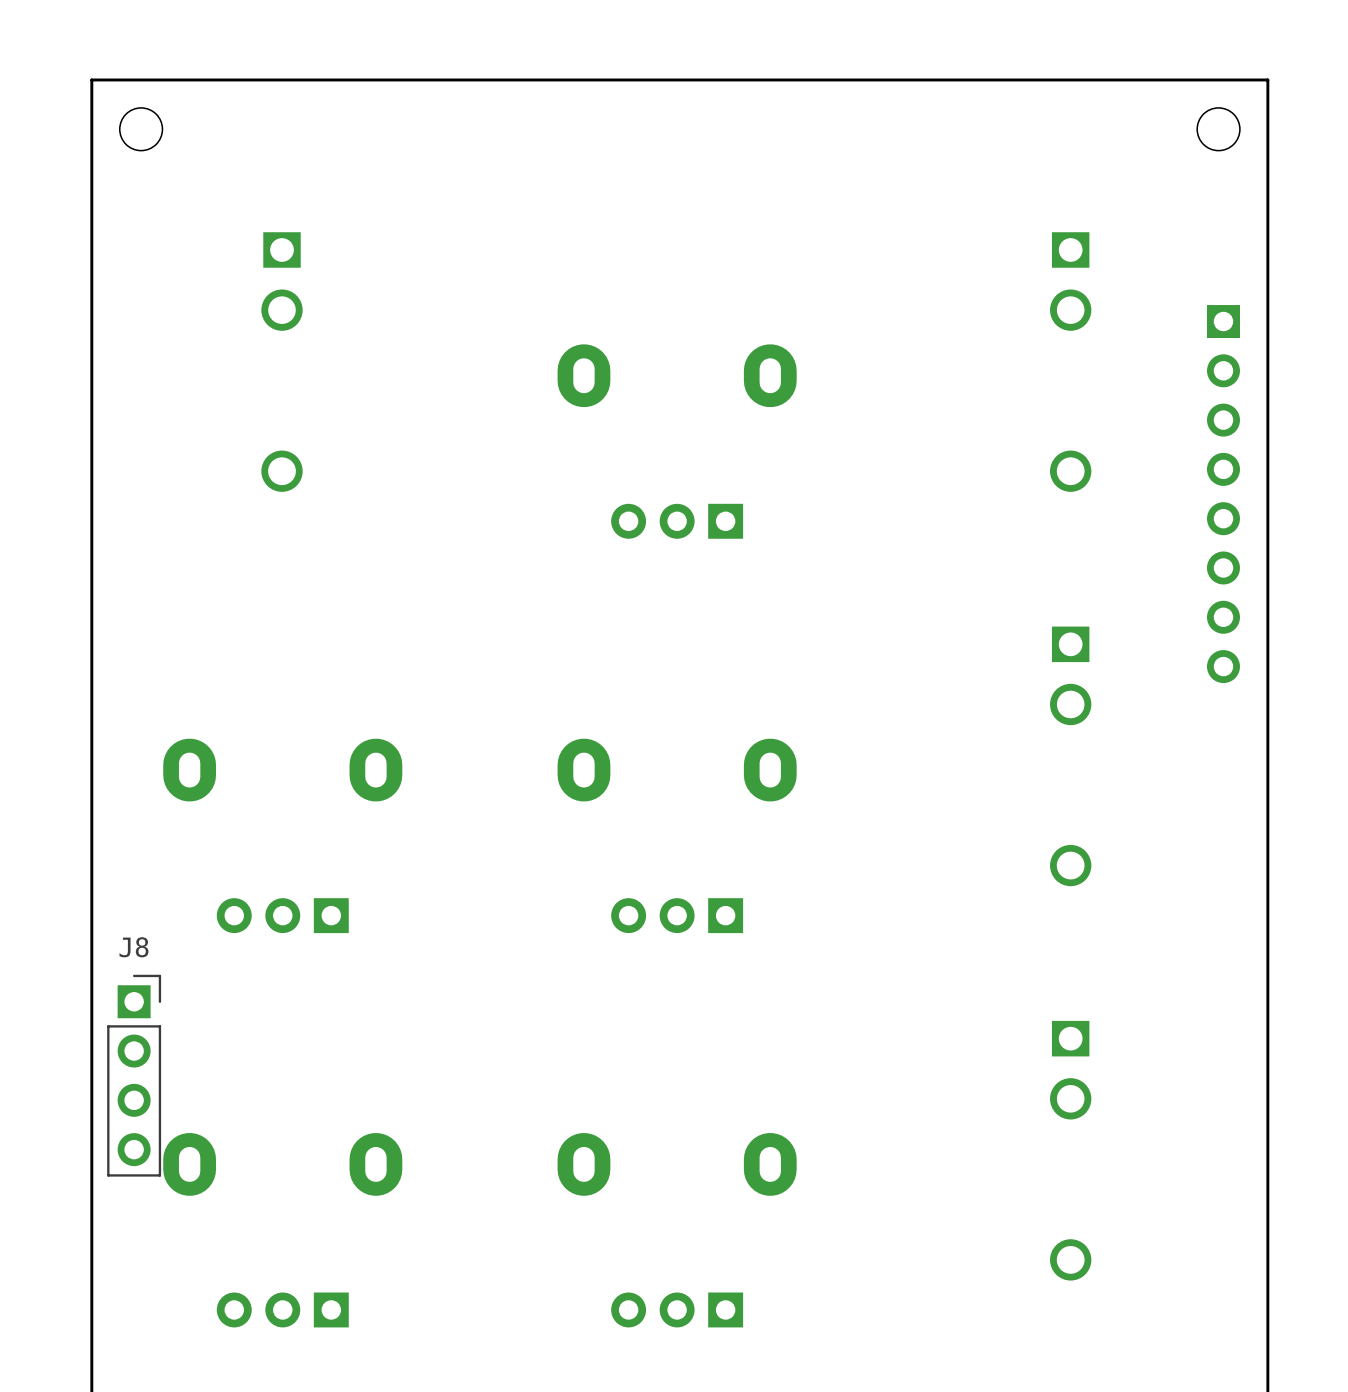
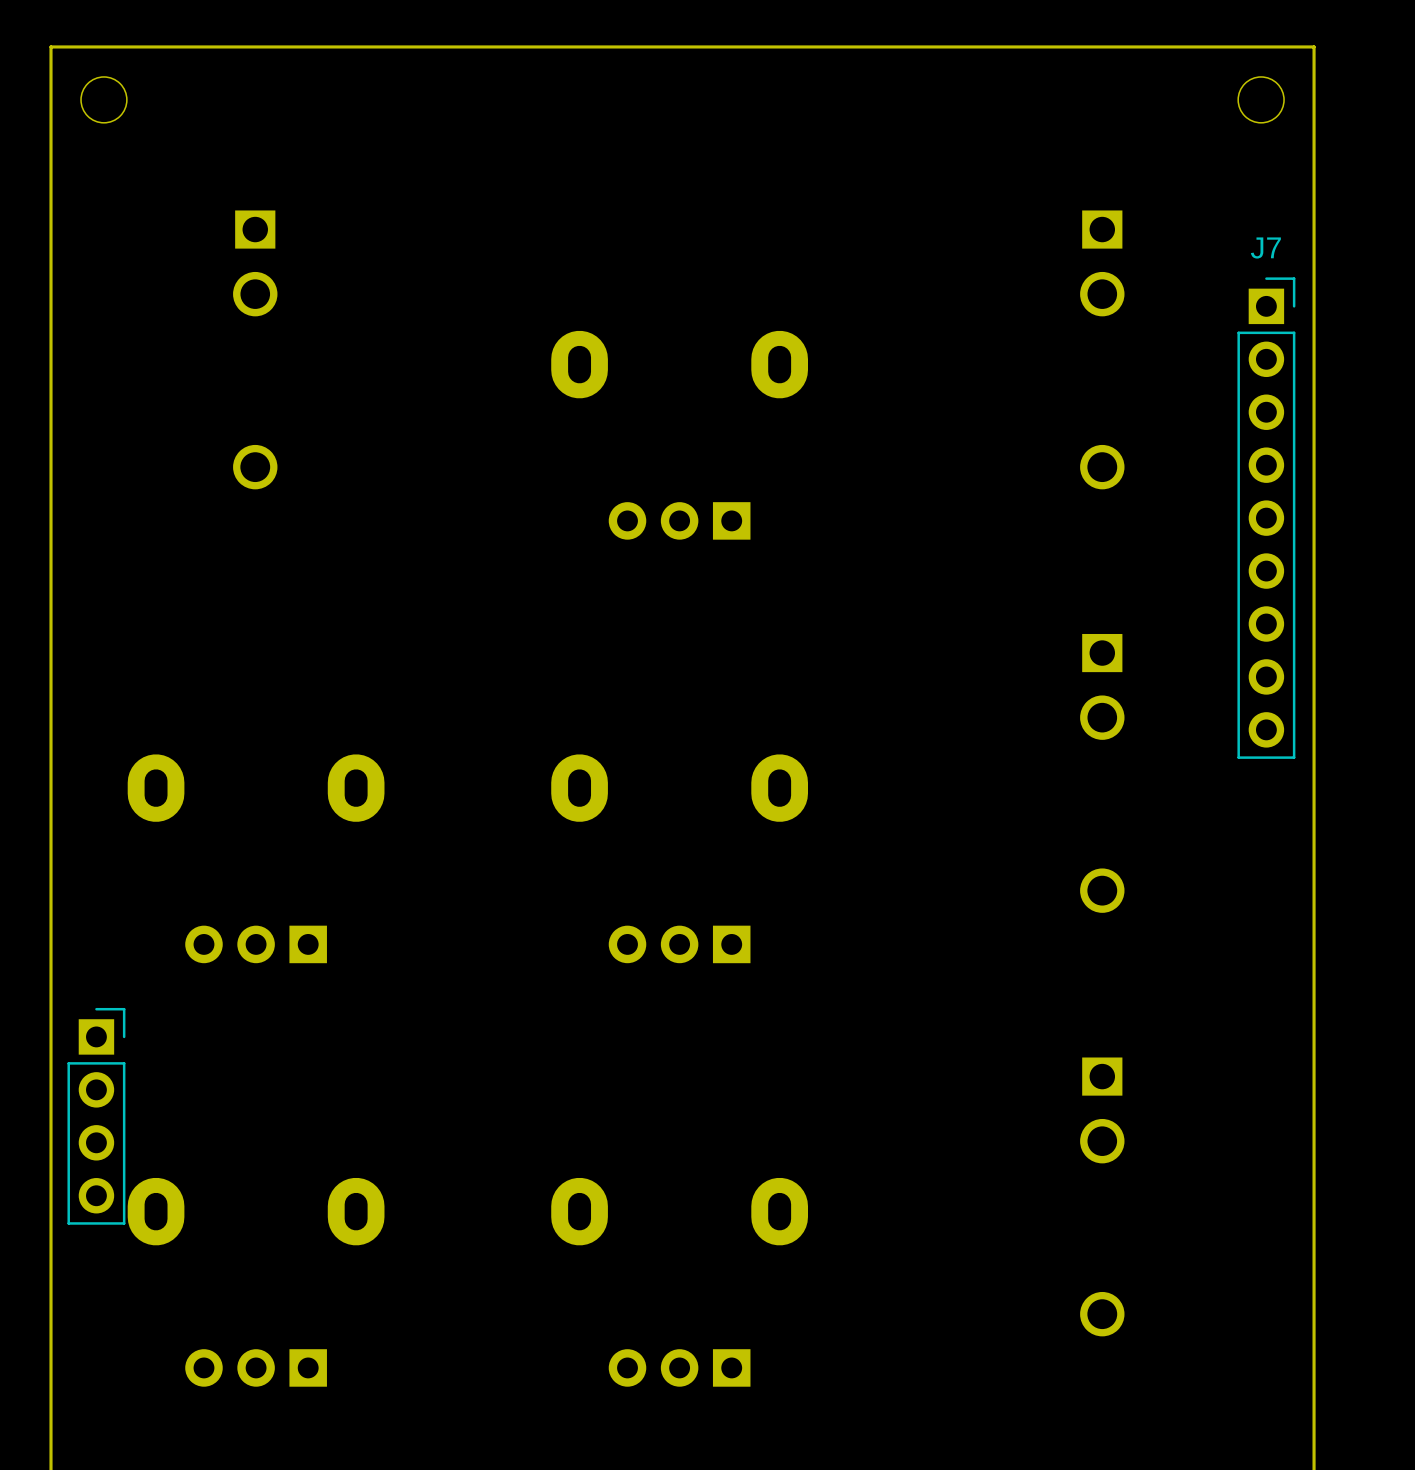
J7: none -> (1266, 518)
J8 name: J8 (133, 947) -> none

